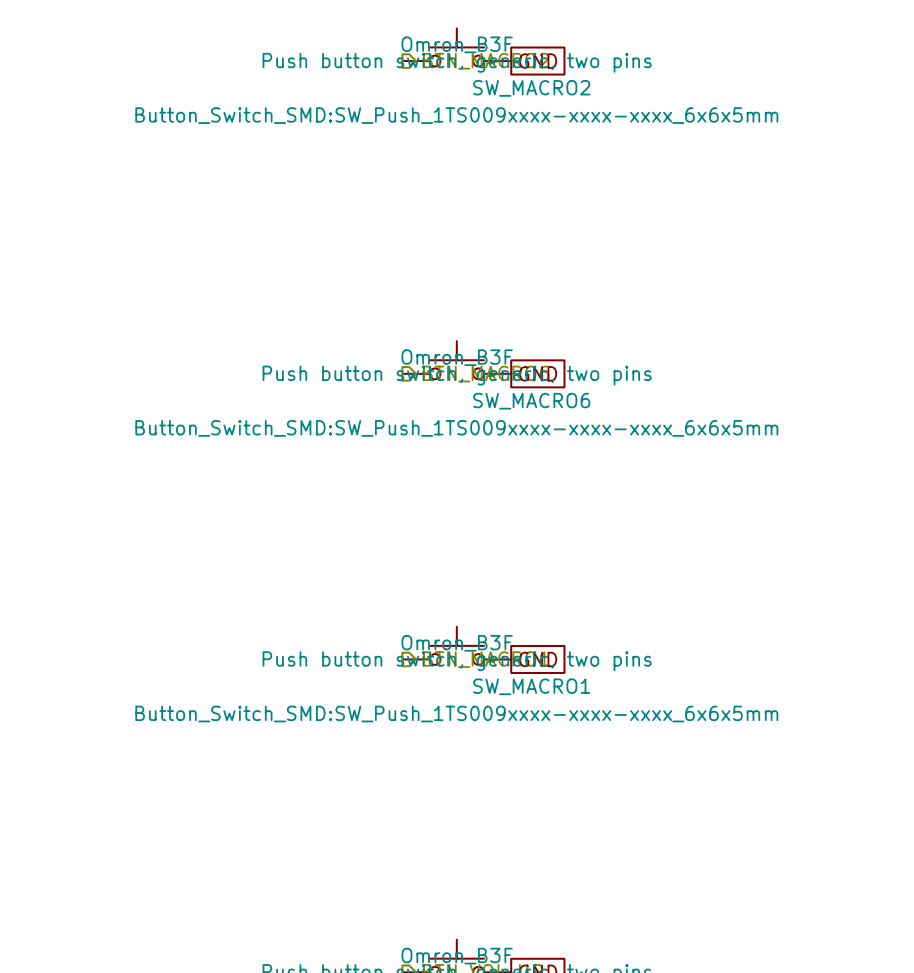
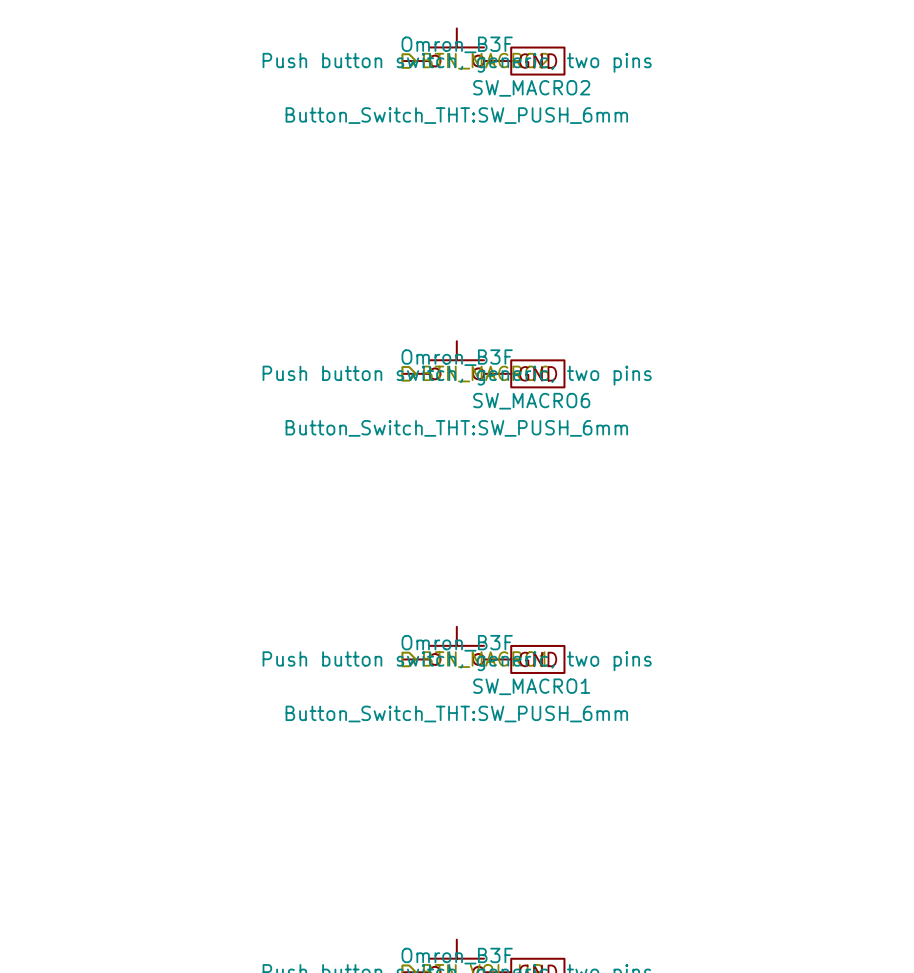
SW_MACRO2 text: Button_Switch_SMD:SW_Push_1TS009xxxx-xxxx-xxxx_6x6x5mm (456, 115) -> Button_Switch_THT:SW_PUSH_6mm (456, 115)
SW_MACRO6 text: Button_Switch_SMD:SW_Push_1TS009xxxx-xxxx-xxxx_6x6x5mm (456, 428) -> Button_Switch_THT:SW_PUSH_6mm (456, 428)
SW_MACRO1 text: Button_Switch_SMD:SW_Push_1TS009xxxx-xxxx-xxxx_6x6x5mm (456, 714) -> Button_Switch_THT:SW_PUSH_6mm (456, 714)

